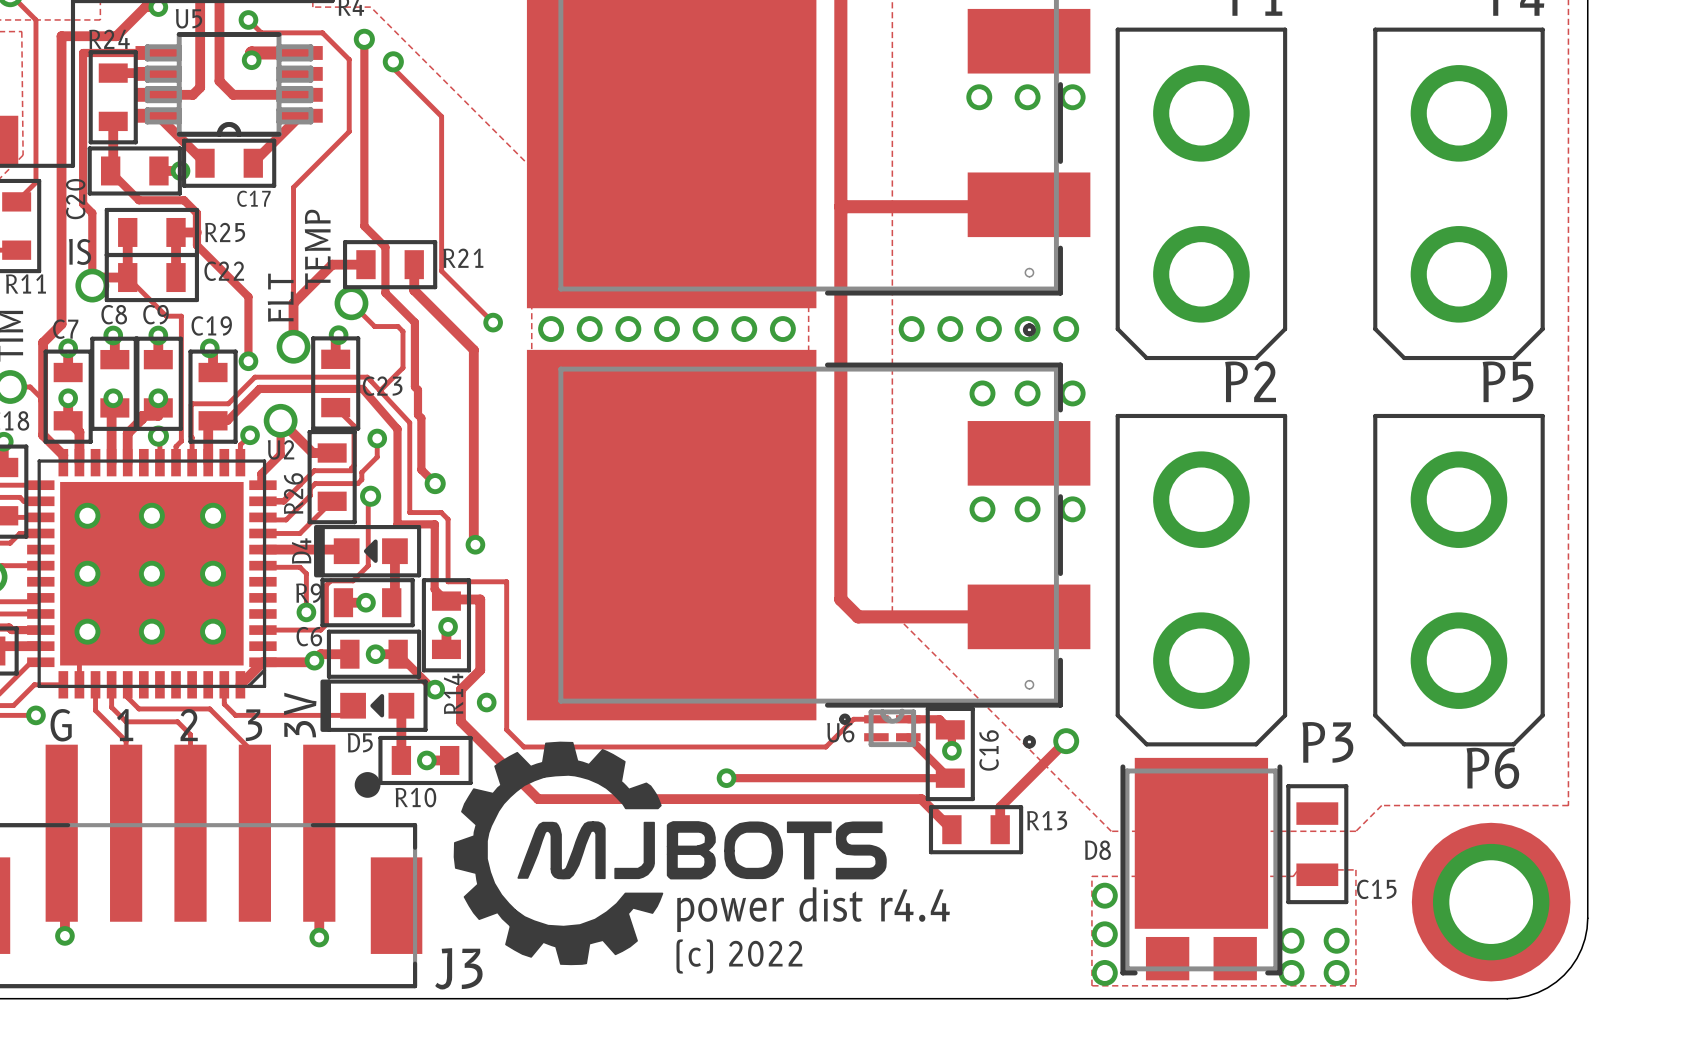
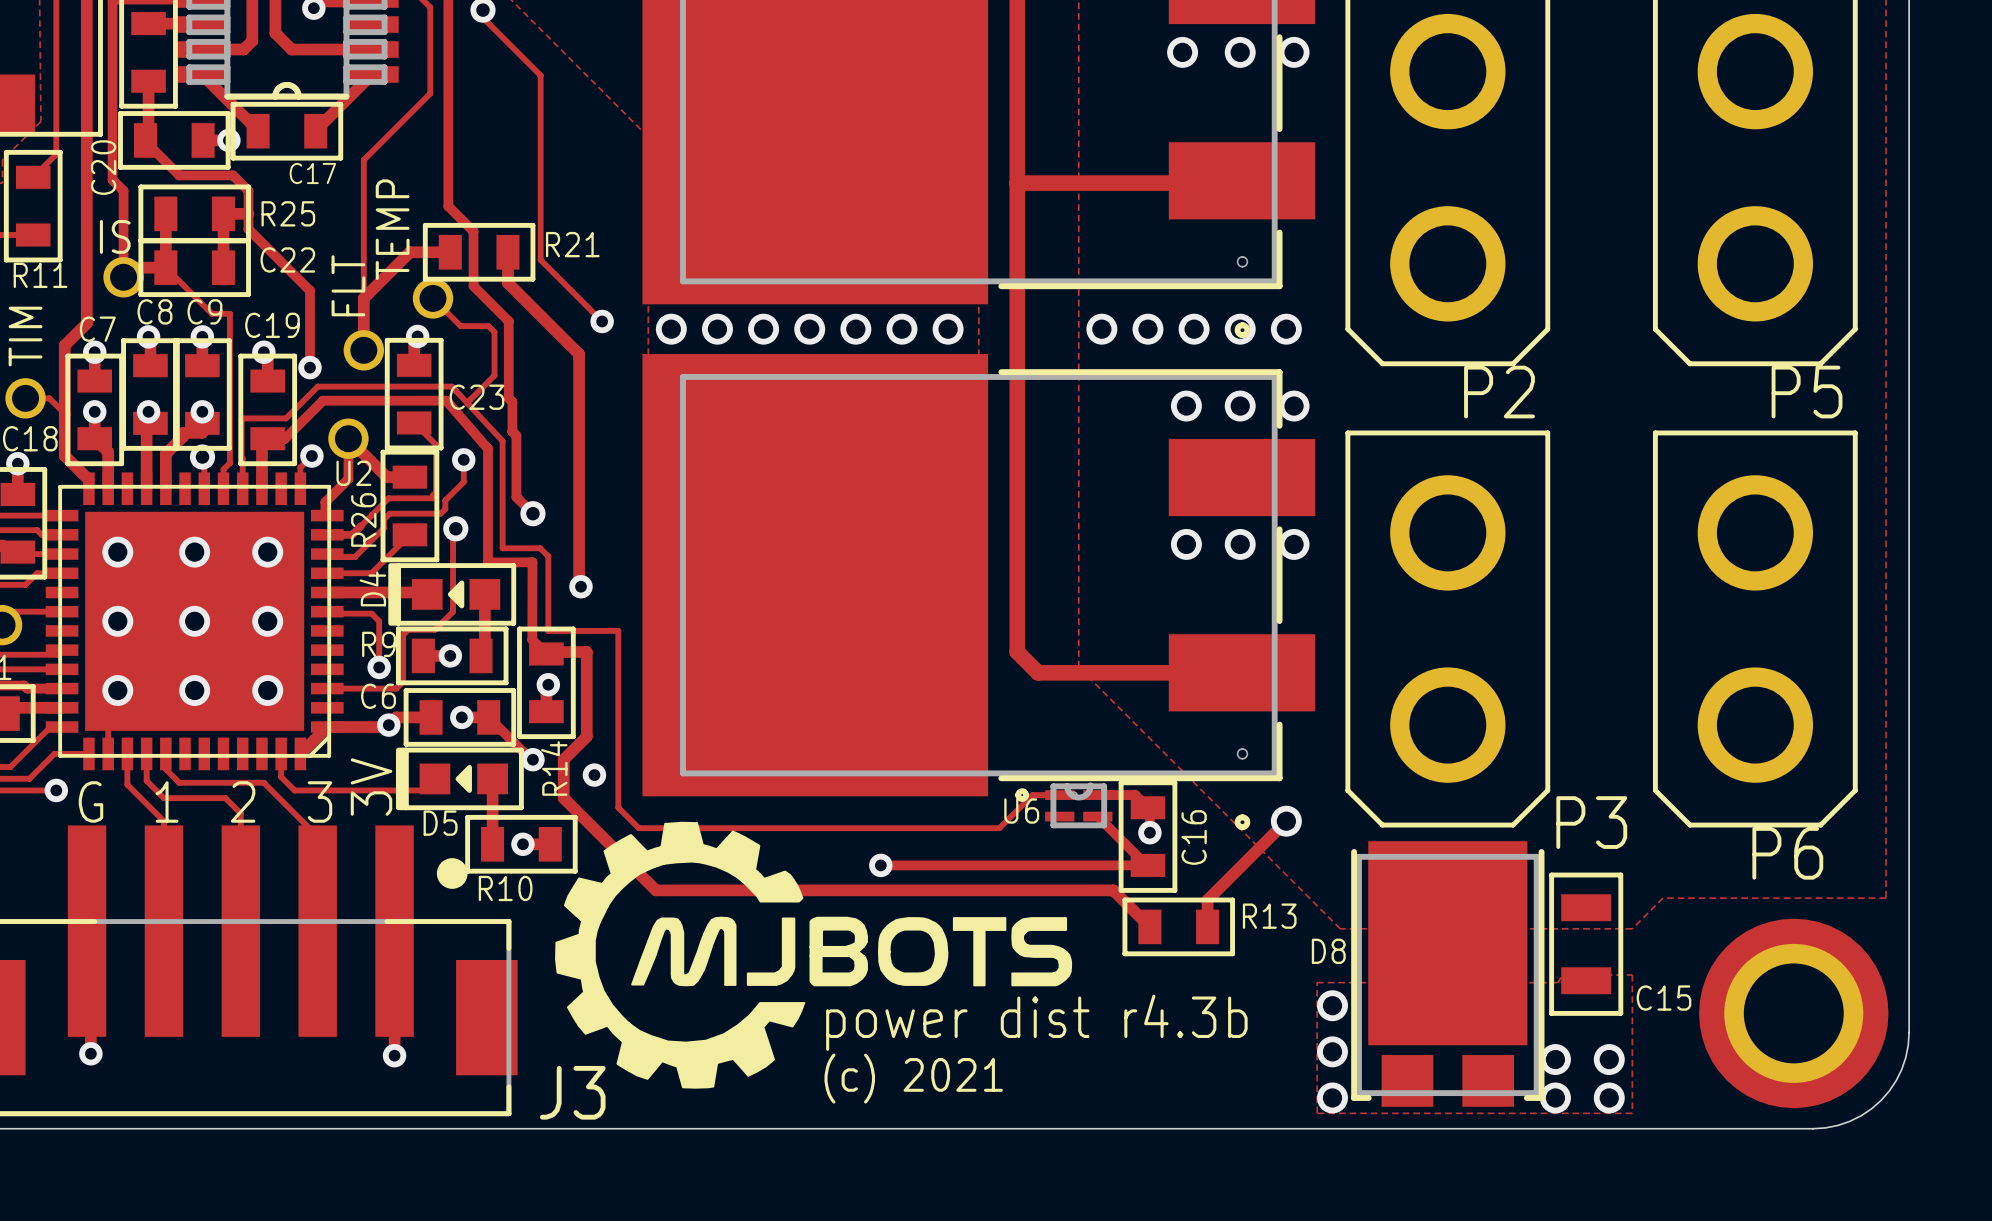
text: power dist r4.4 (813, 909) -> power dist r4.3b (1036, 1022)
text: (c) 2022 (739, 956) -> (c) 2021 (913, 1078)

